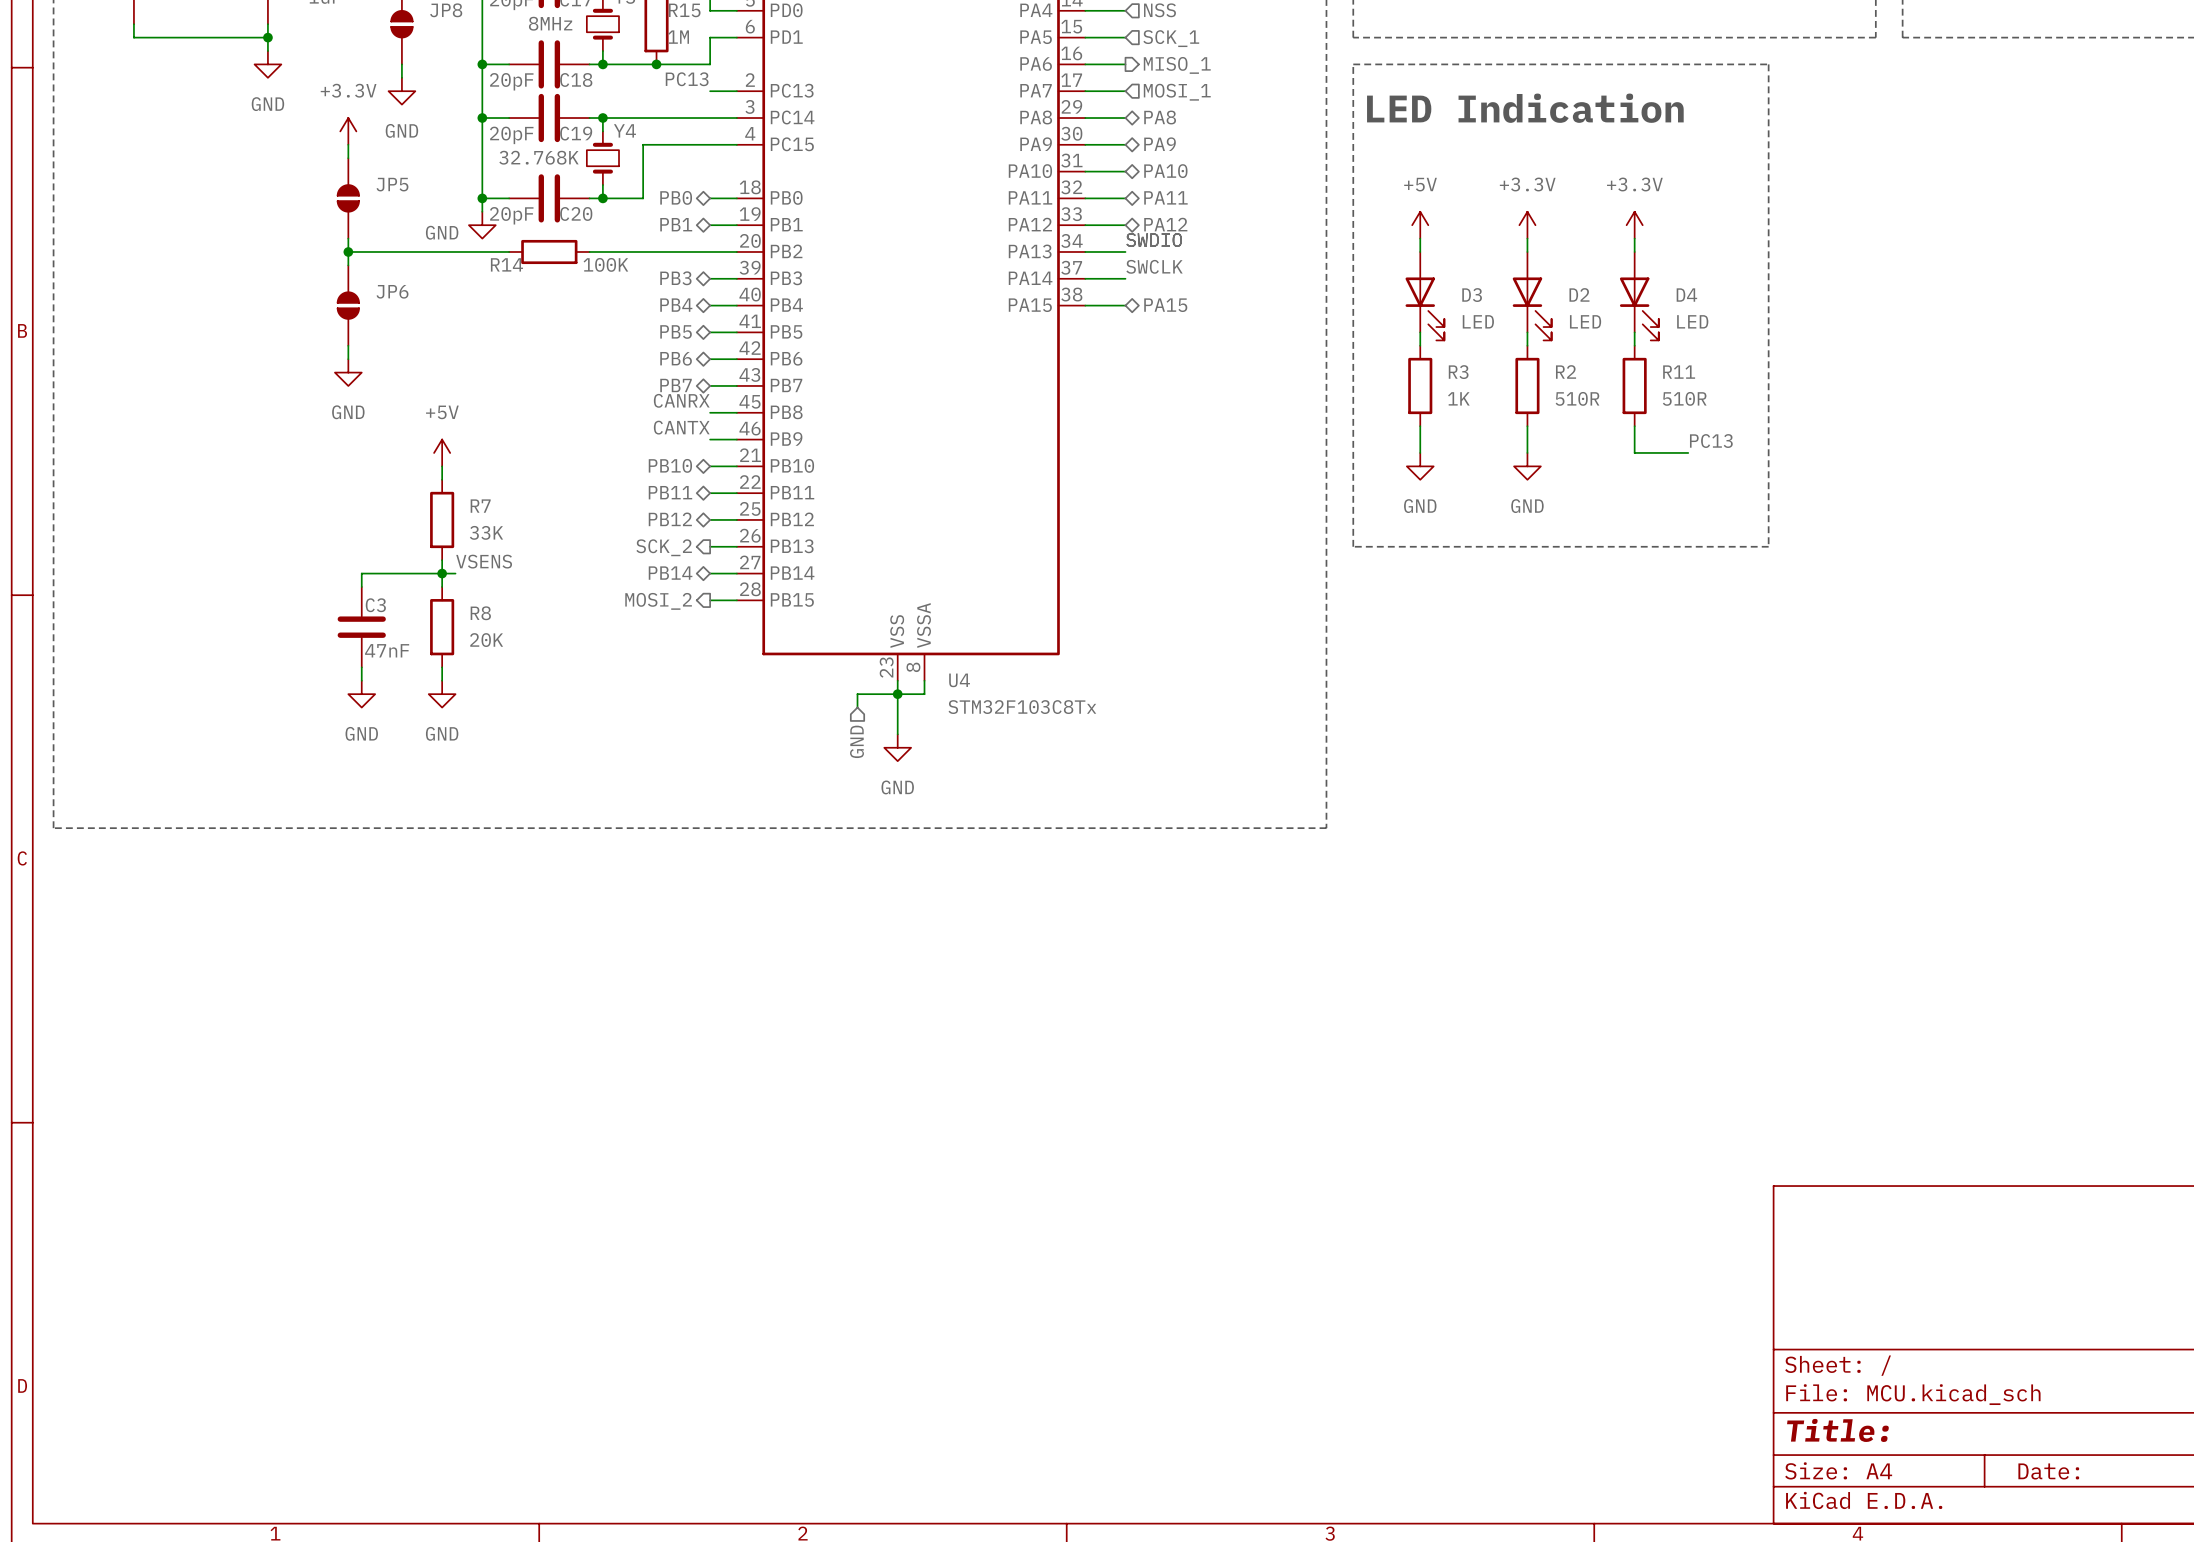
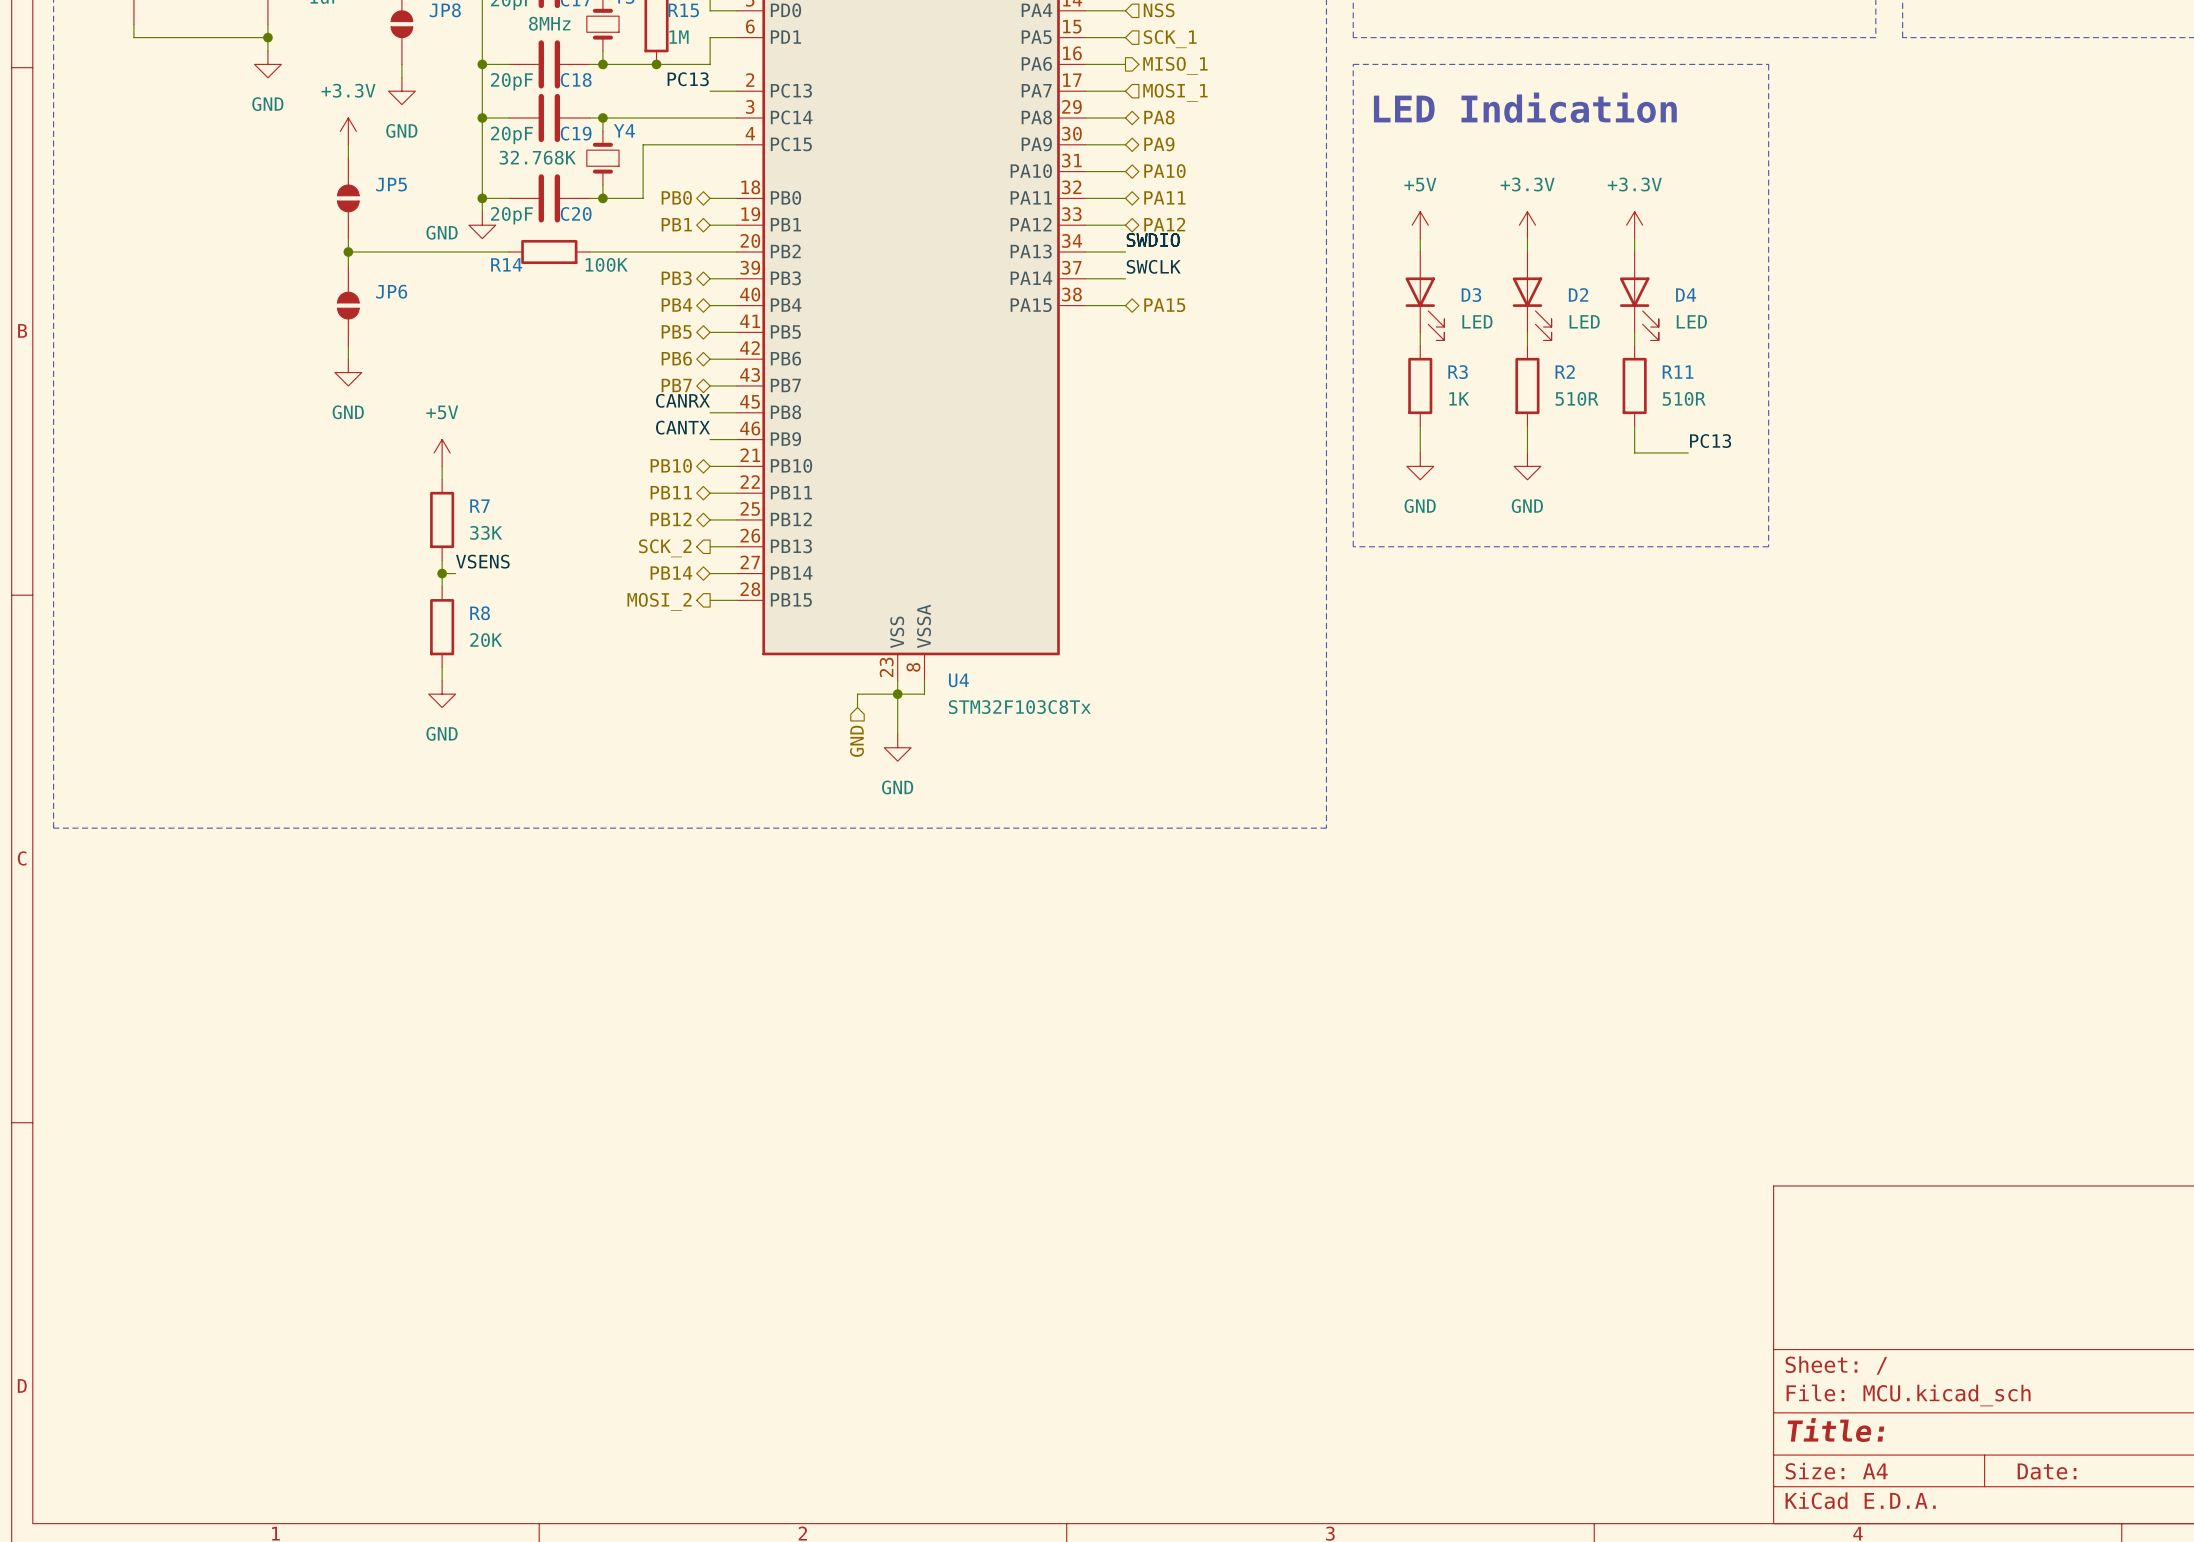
wire: (442, 573) (361, 573) (361, 586) -> none
C3: 47nF (361, 627) -> none
wire: (361, 667) (361, 680) -> none
power symbol: GND (361, 694) -> none

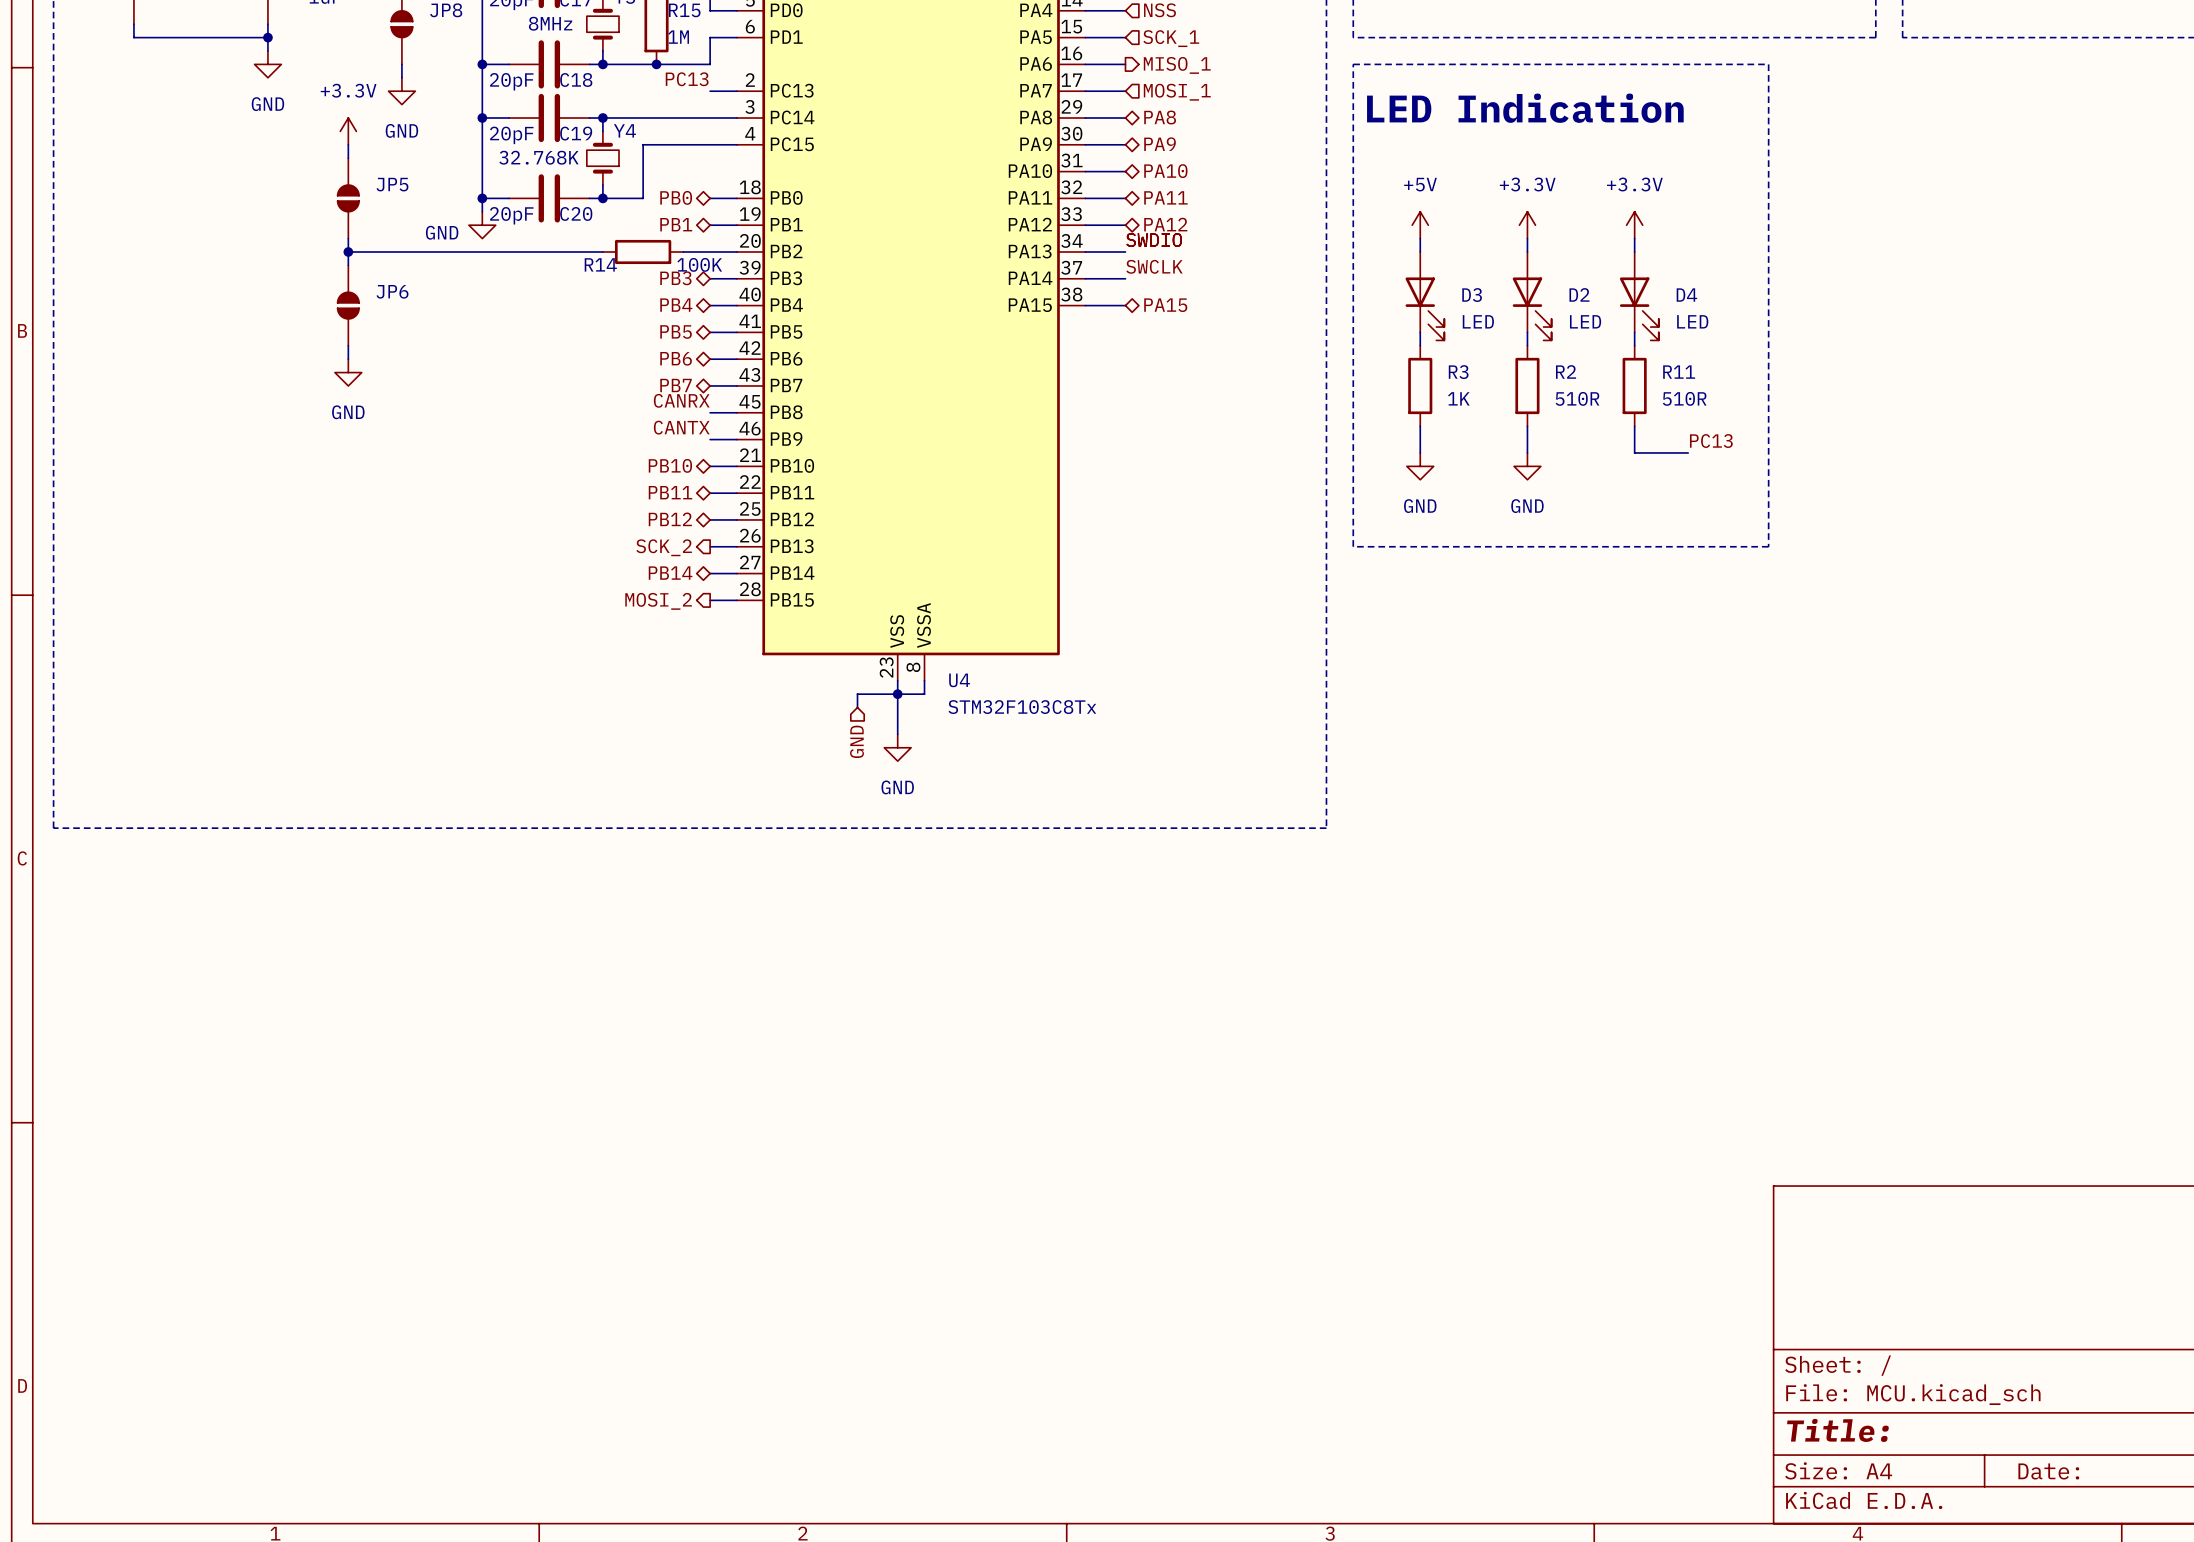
R14 position: (549, 251) -> (643, 251)
wire: (602, 251) (683, 251) -> (509, 251) (589, 251)
power symbol: +5V (442, 452) -> none
wire: (442, 466) (442, 479) -> none
R7: 33K (442, 519) -> none
wire: (442, 560) (442, 586) -> none
label: VSENS (482, 561) -> none
wire: (442, 573) (455, 573) -> none
junction: (442, 573) -> none
R8: 20K (442, 627) -> none
wire: (442, 667) (442, 680) -> none
power symbol: GND (442, 694) -> none

